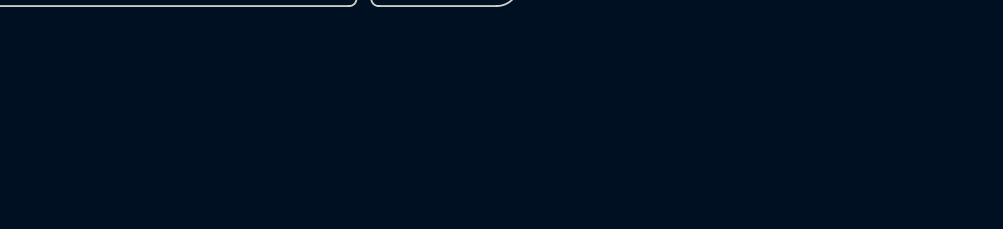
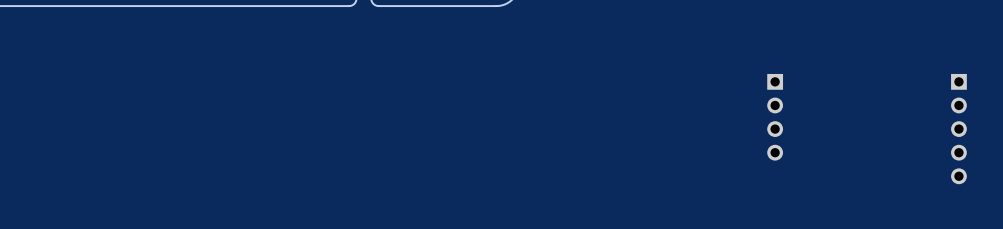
part: none -> (775, 117)
part: none -> (958, 129)

